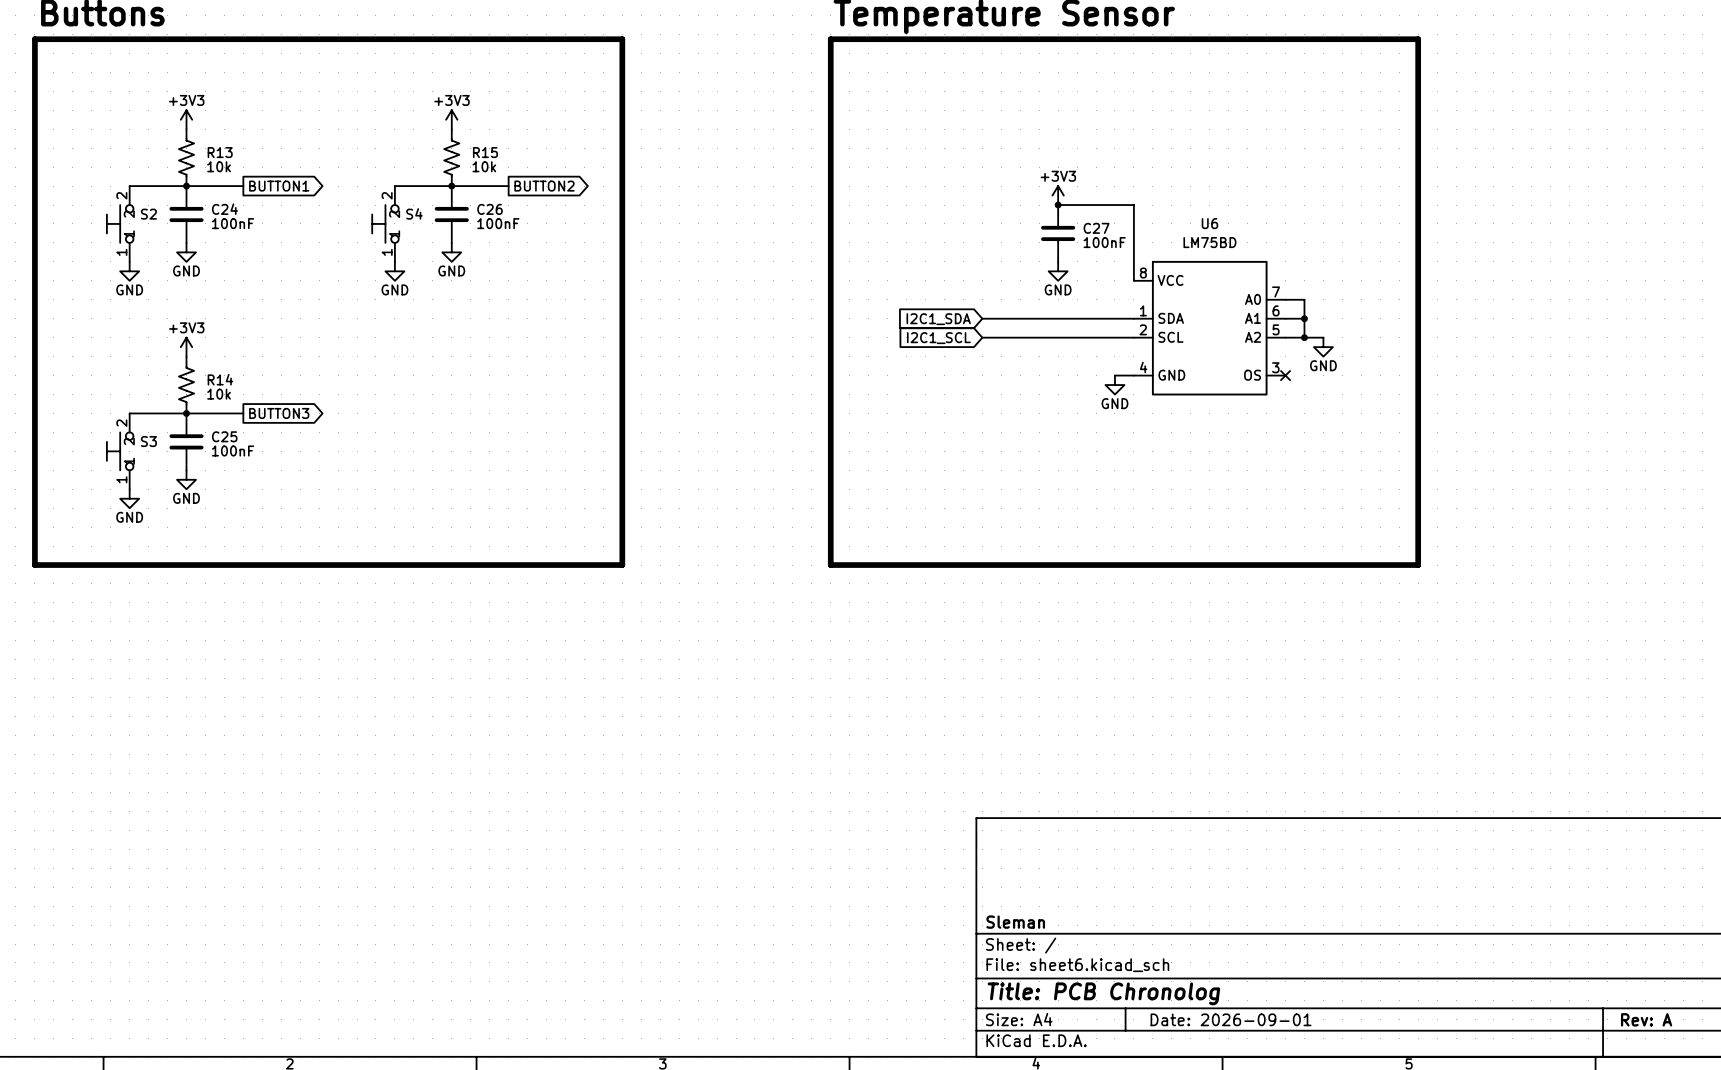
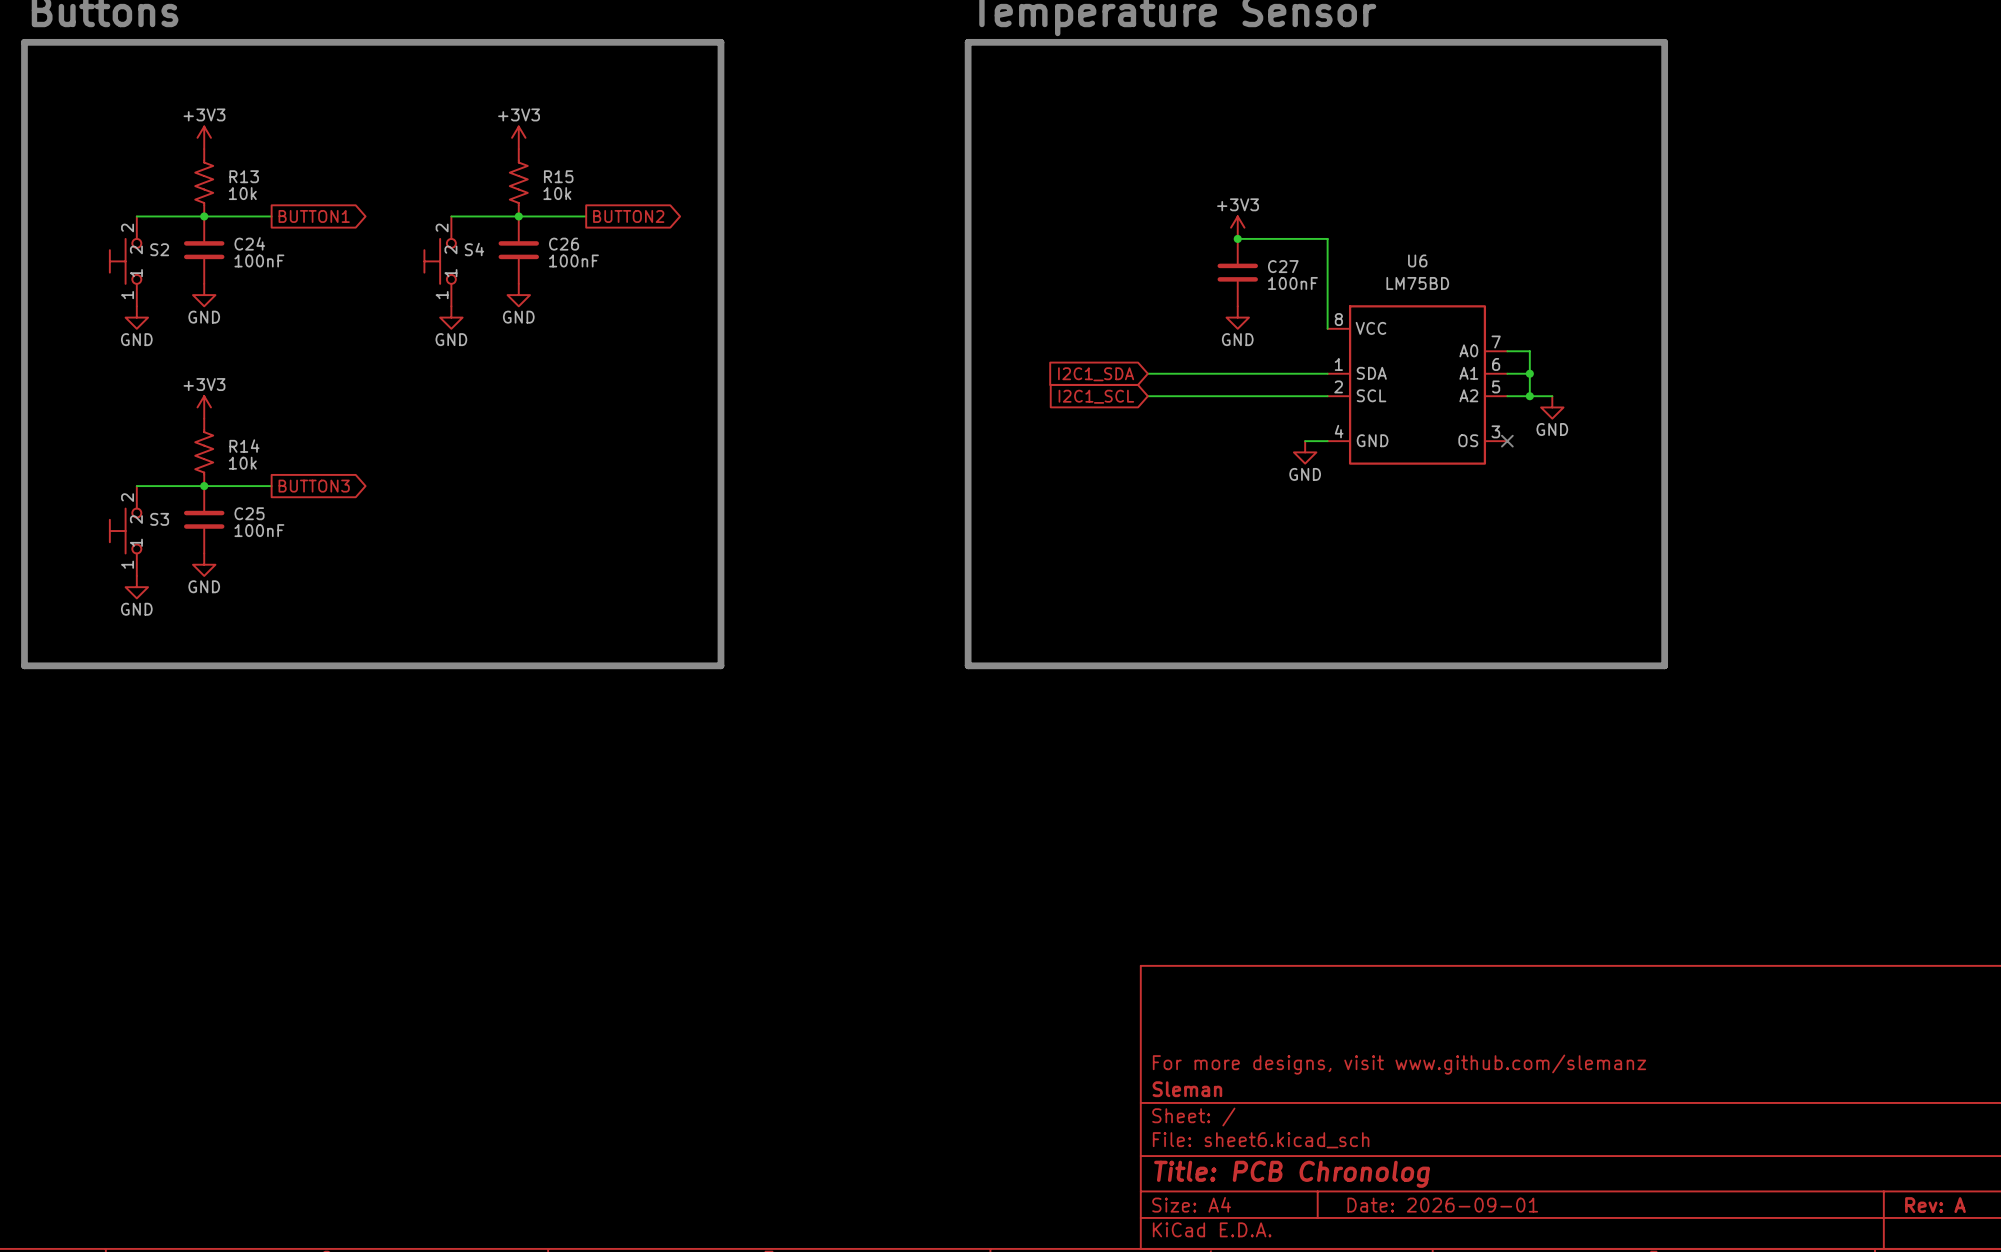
title block: none -> For more designs, visit www.github.com/slemanz (1399, 1064)

